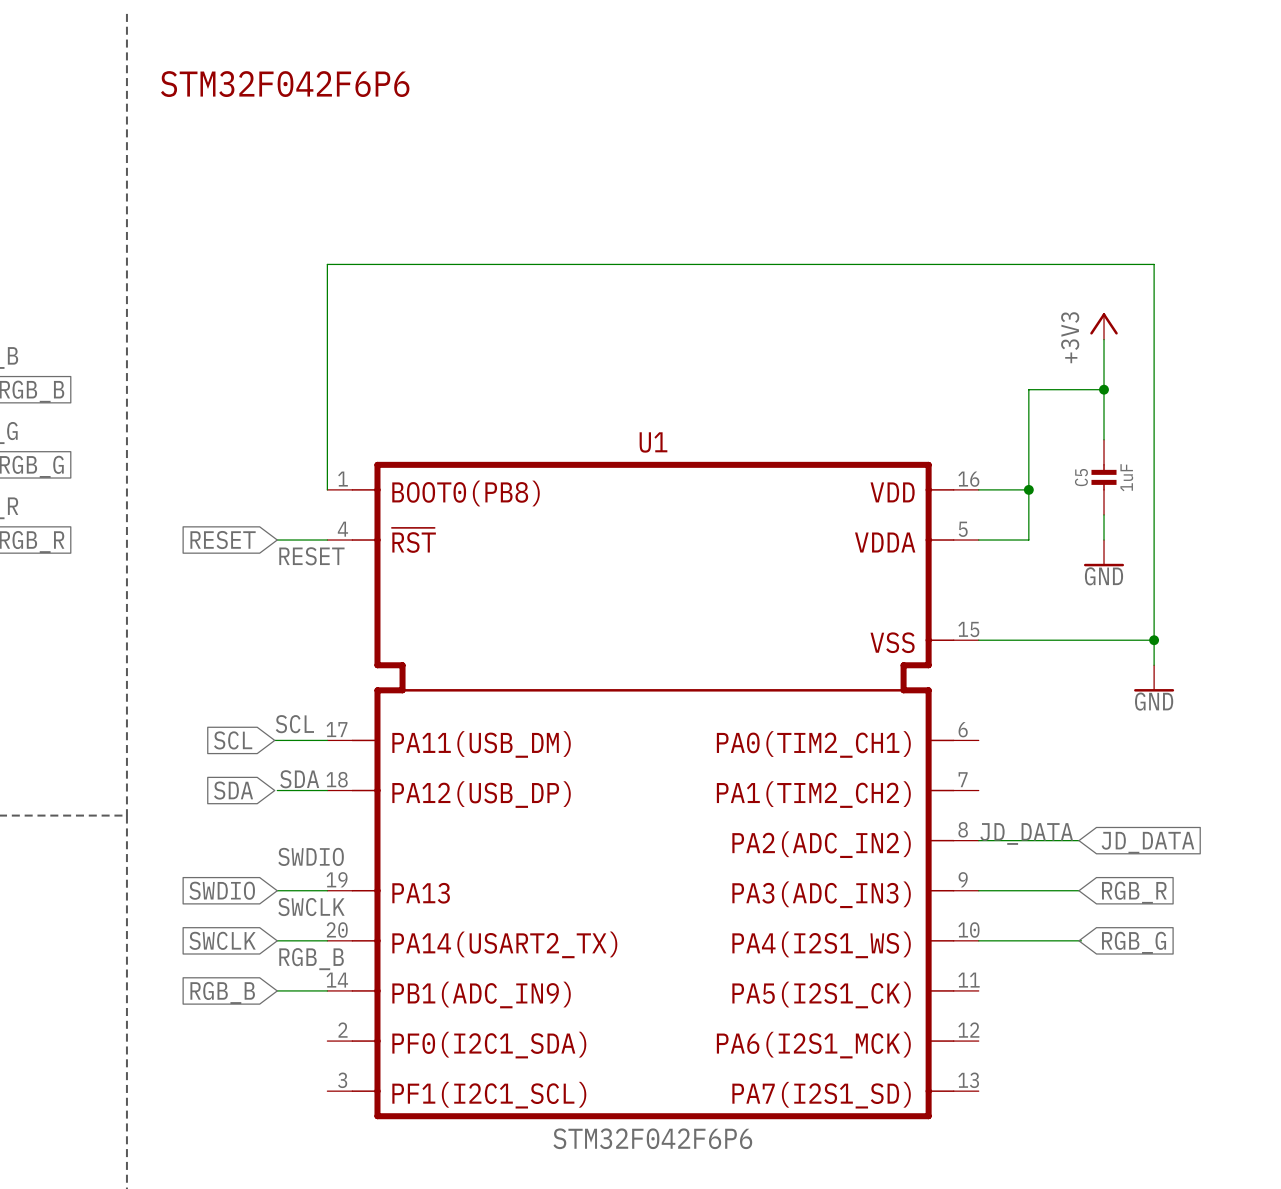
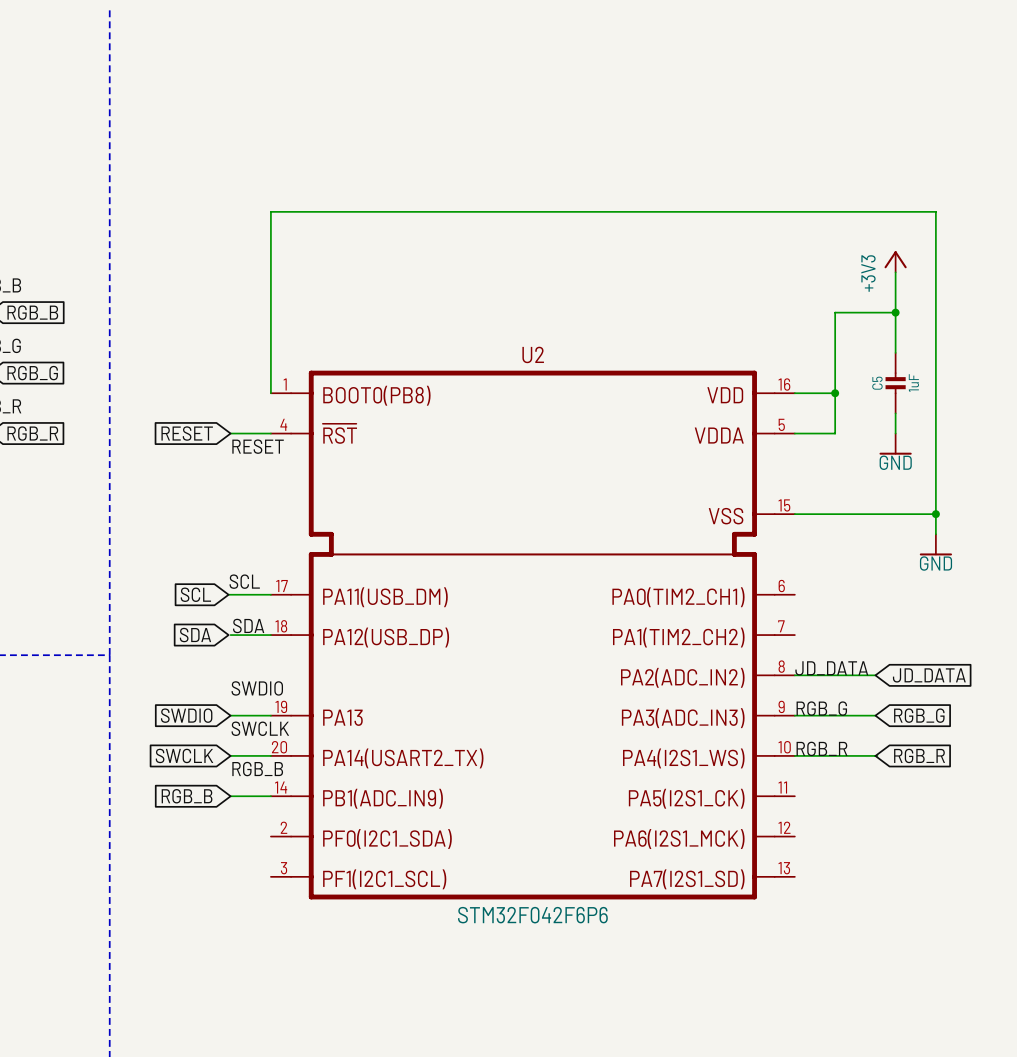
text: STM32F042F6P6 (285, 84) -> none
U1 name: U1 (653, 442) -> U2 (533, 354)
label: none -> RGB_G (821, 708)
global label: RGB_R (1134, 892) -> RGB_G (919, 715)
label: none -> RGB_R (821, 748)
global label: RGB_G (1134, 942) -> RGB_R (919, 755)

